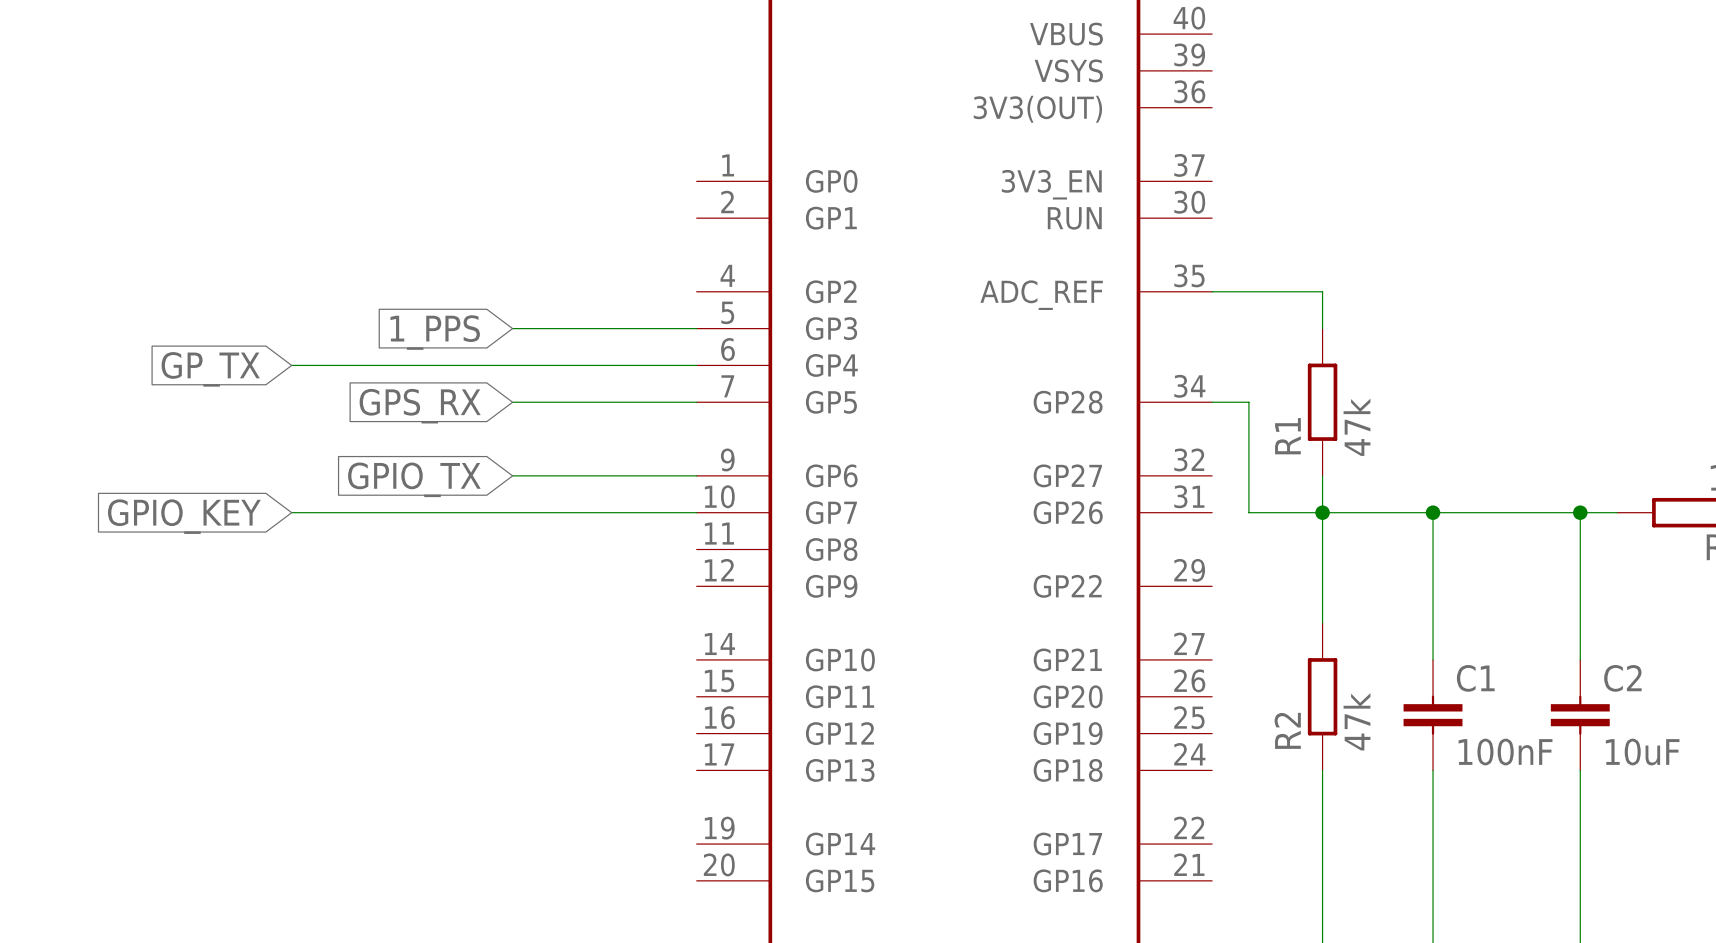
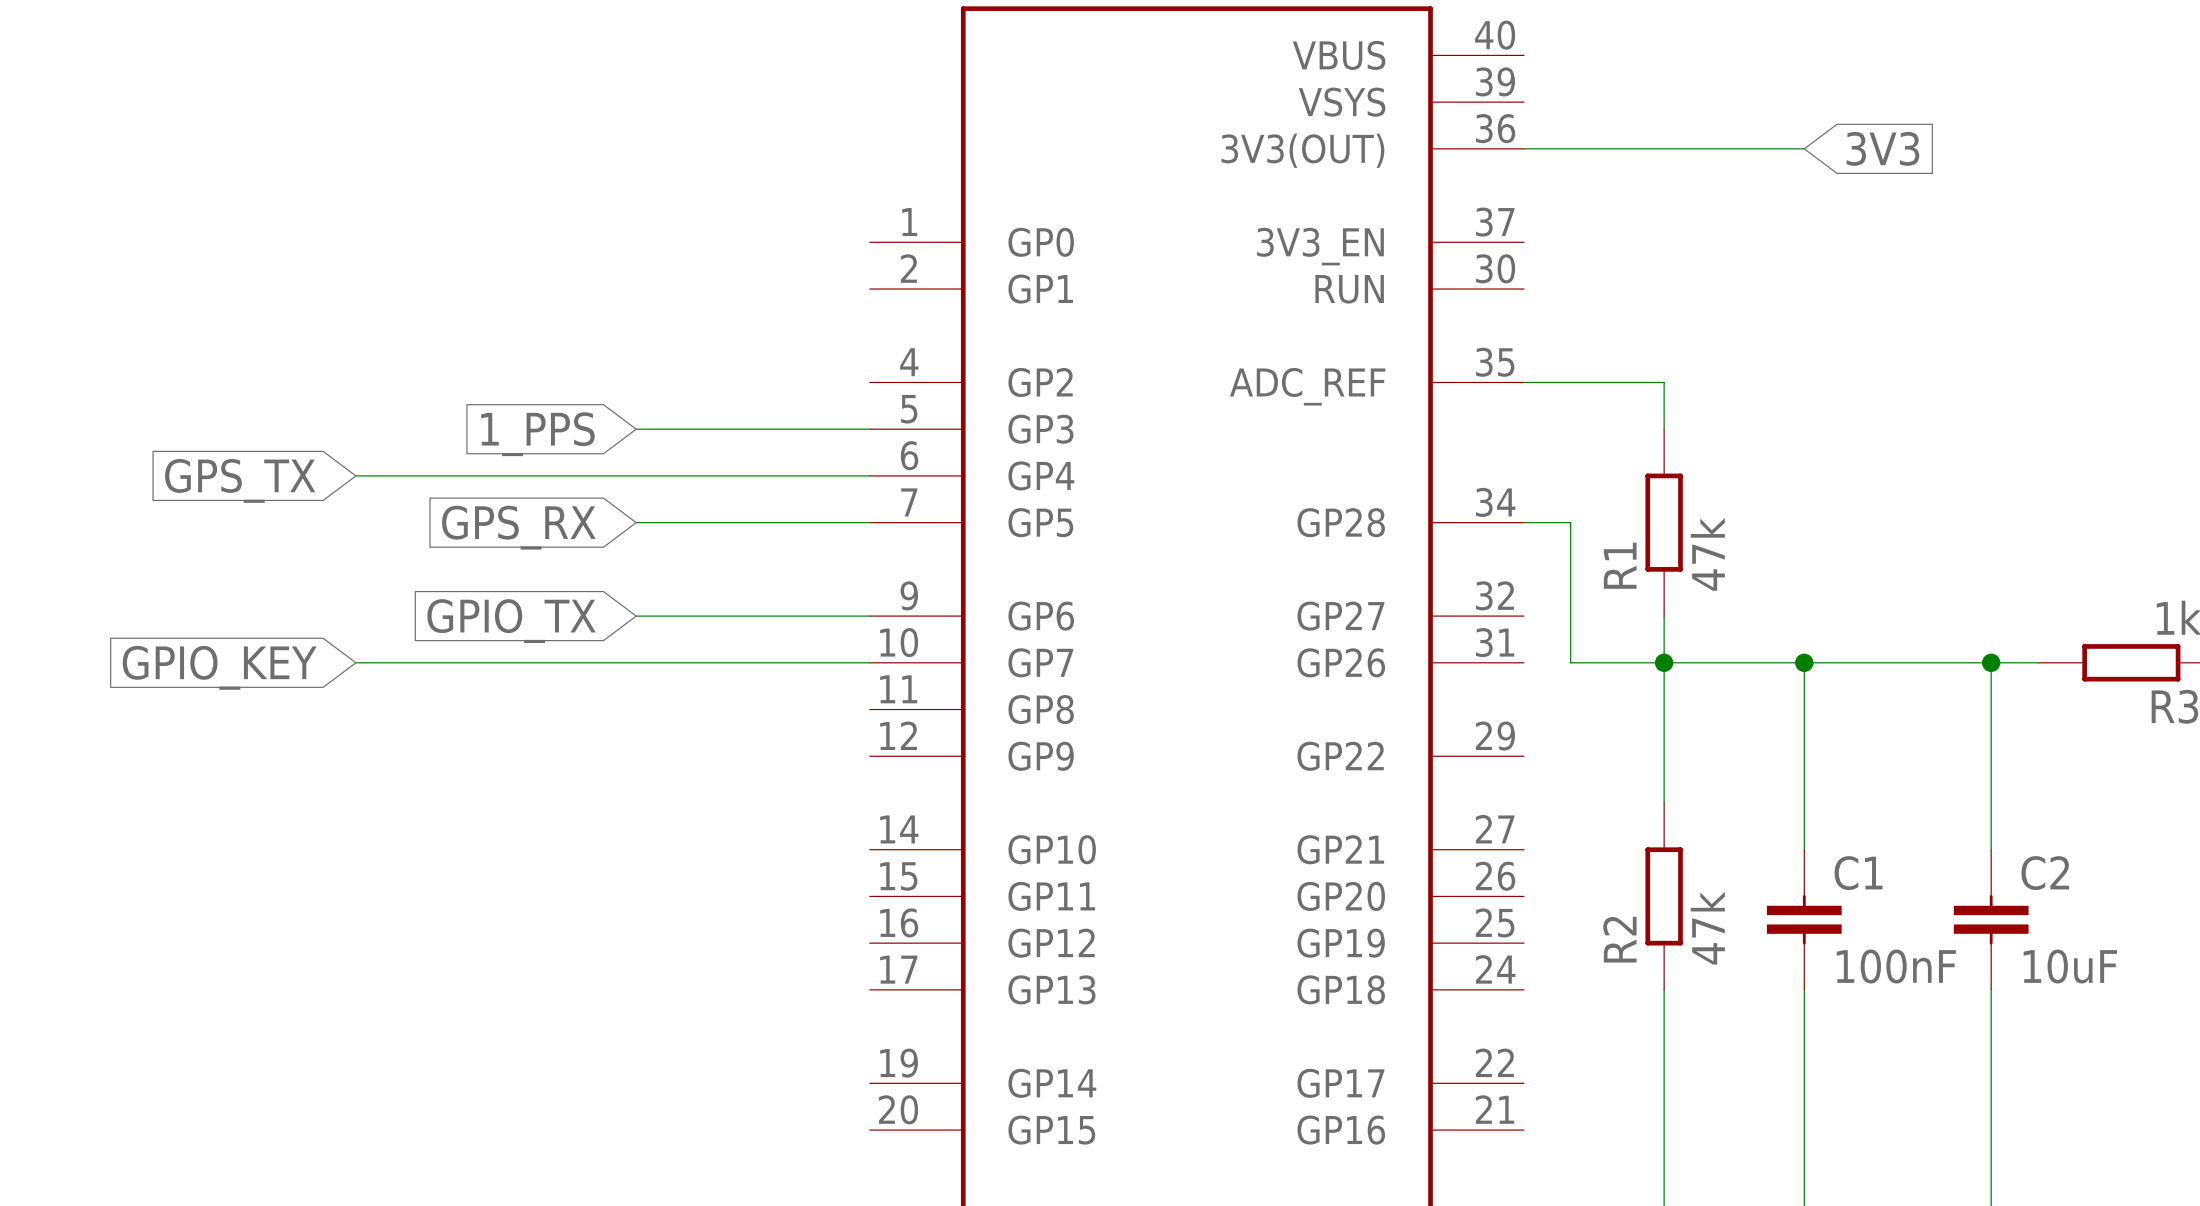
wire: none -> (1523, 148) (1804, 148)
global label: none -> 3V3 (1882, 148)
global label: GP_TX (210, 369) -> GPS_TX (240, 480)

